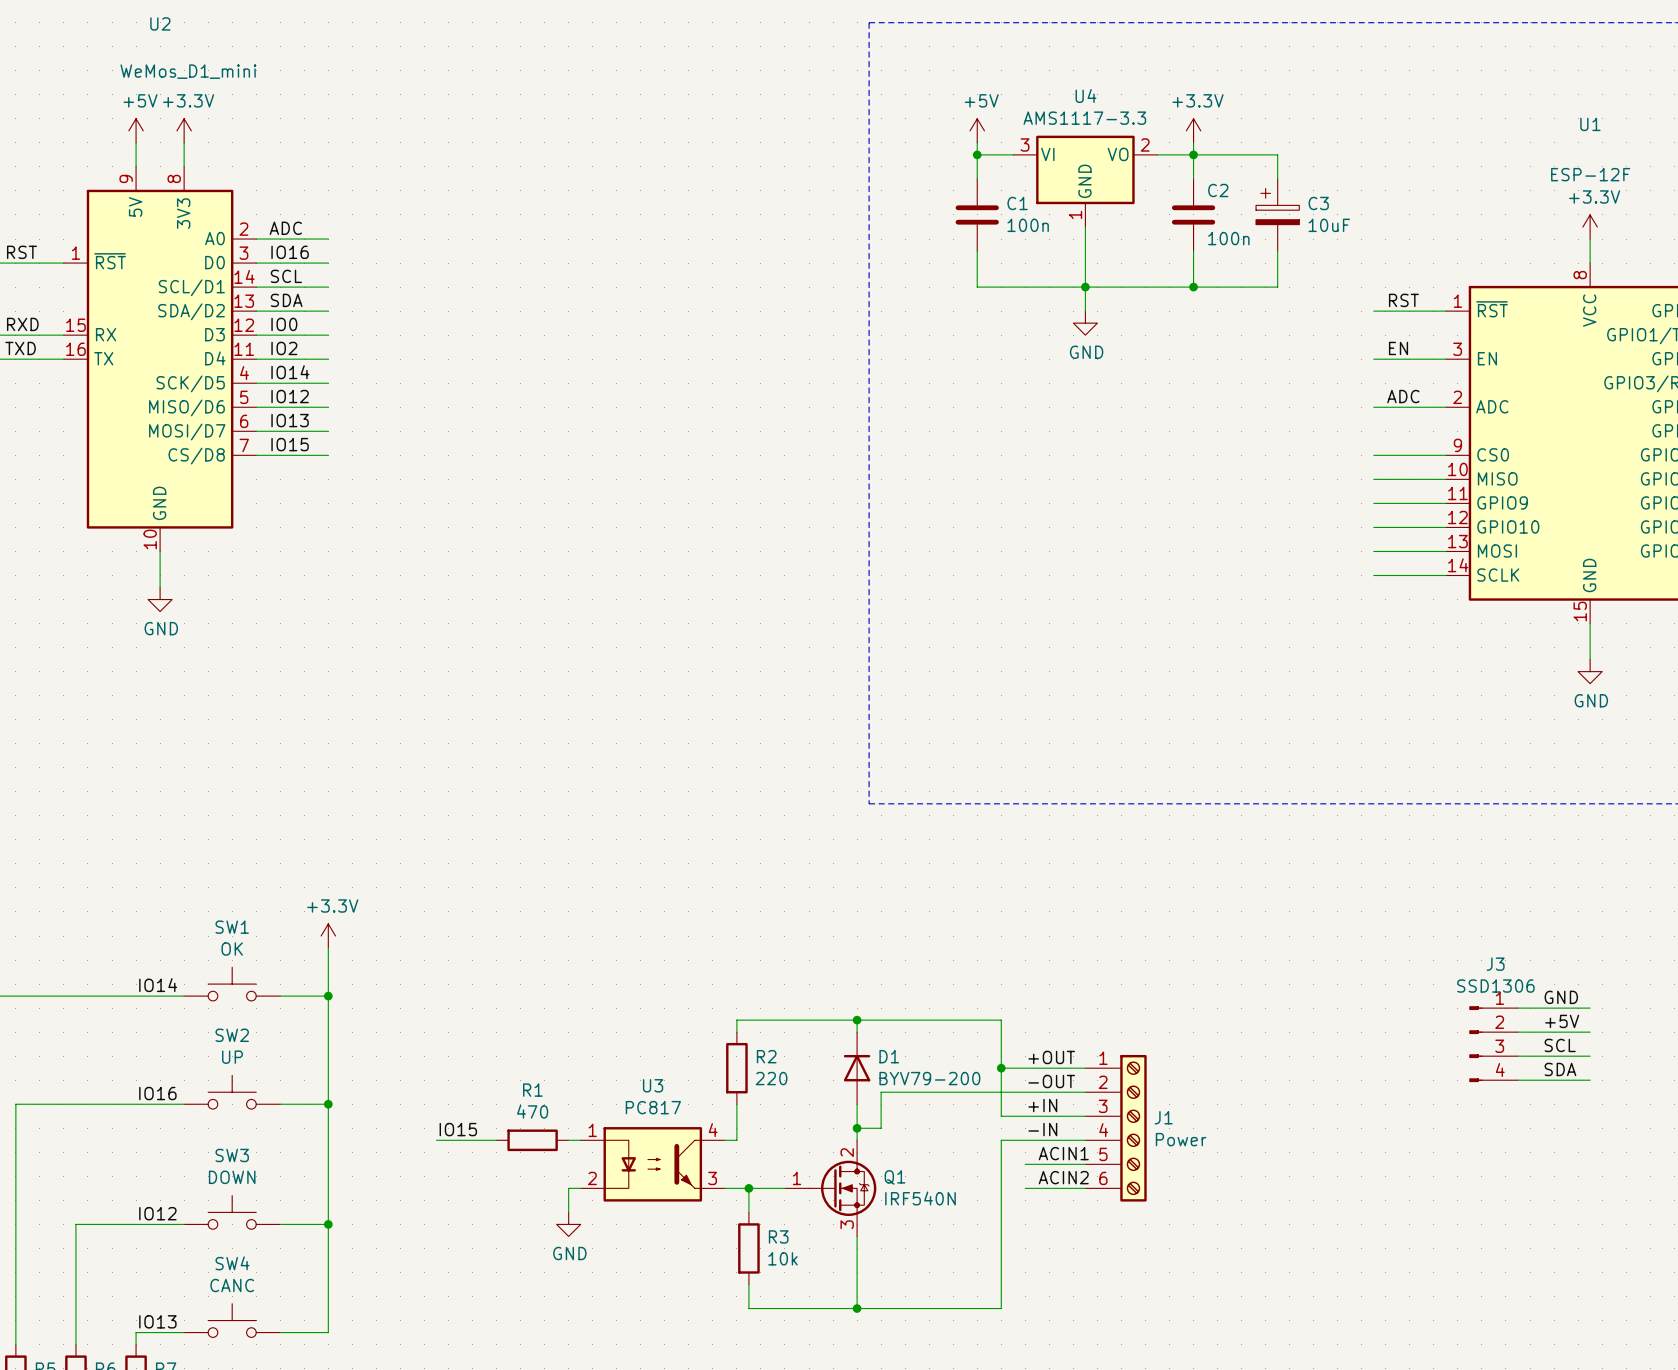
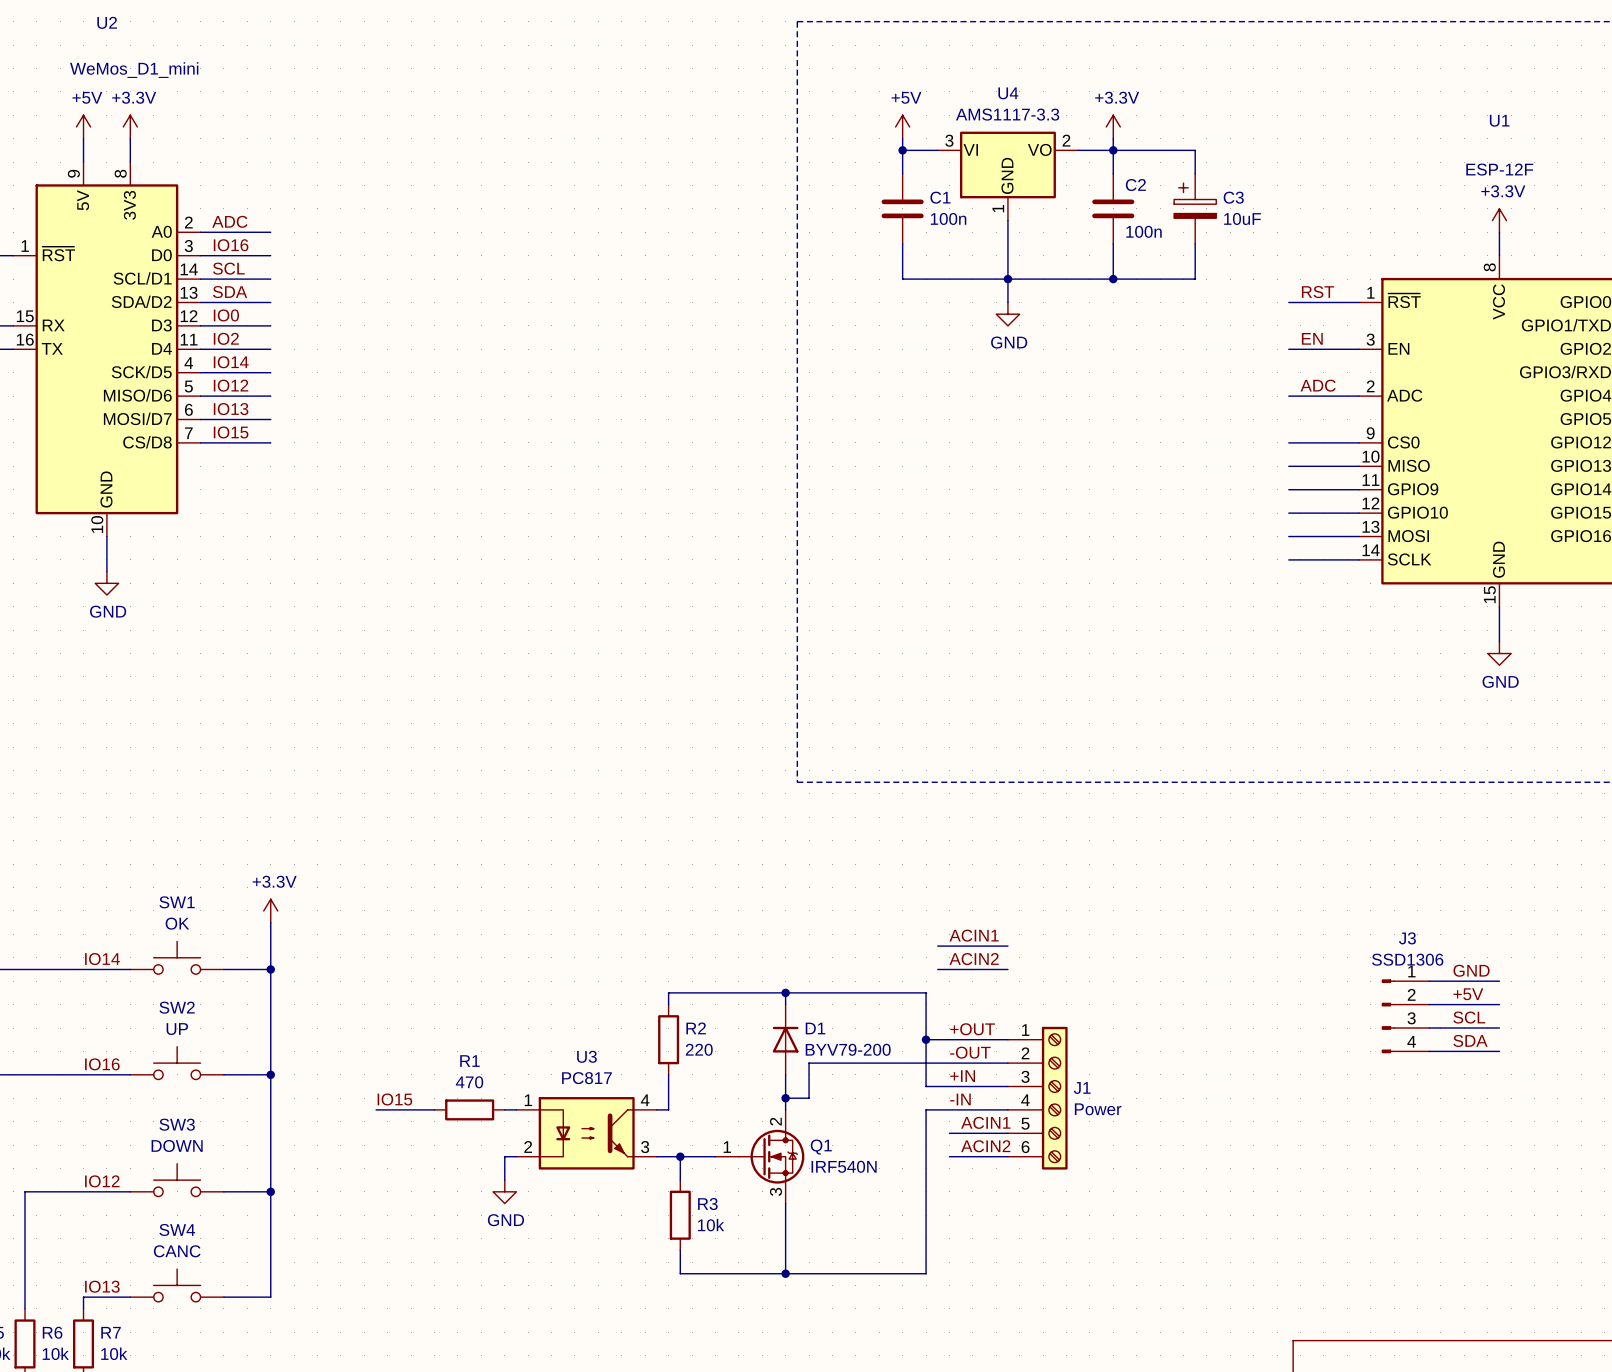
label: none -> ACIN1 (974, 935)
wire: none -> (937, 946) (1007, 946)
label: none -> ACIN2 (974, 959)
wire: none -> (937, 969) (1007, 969)

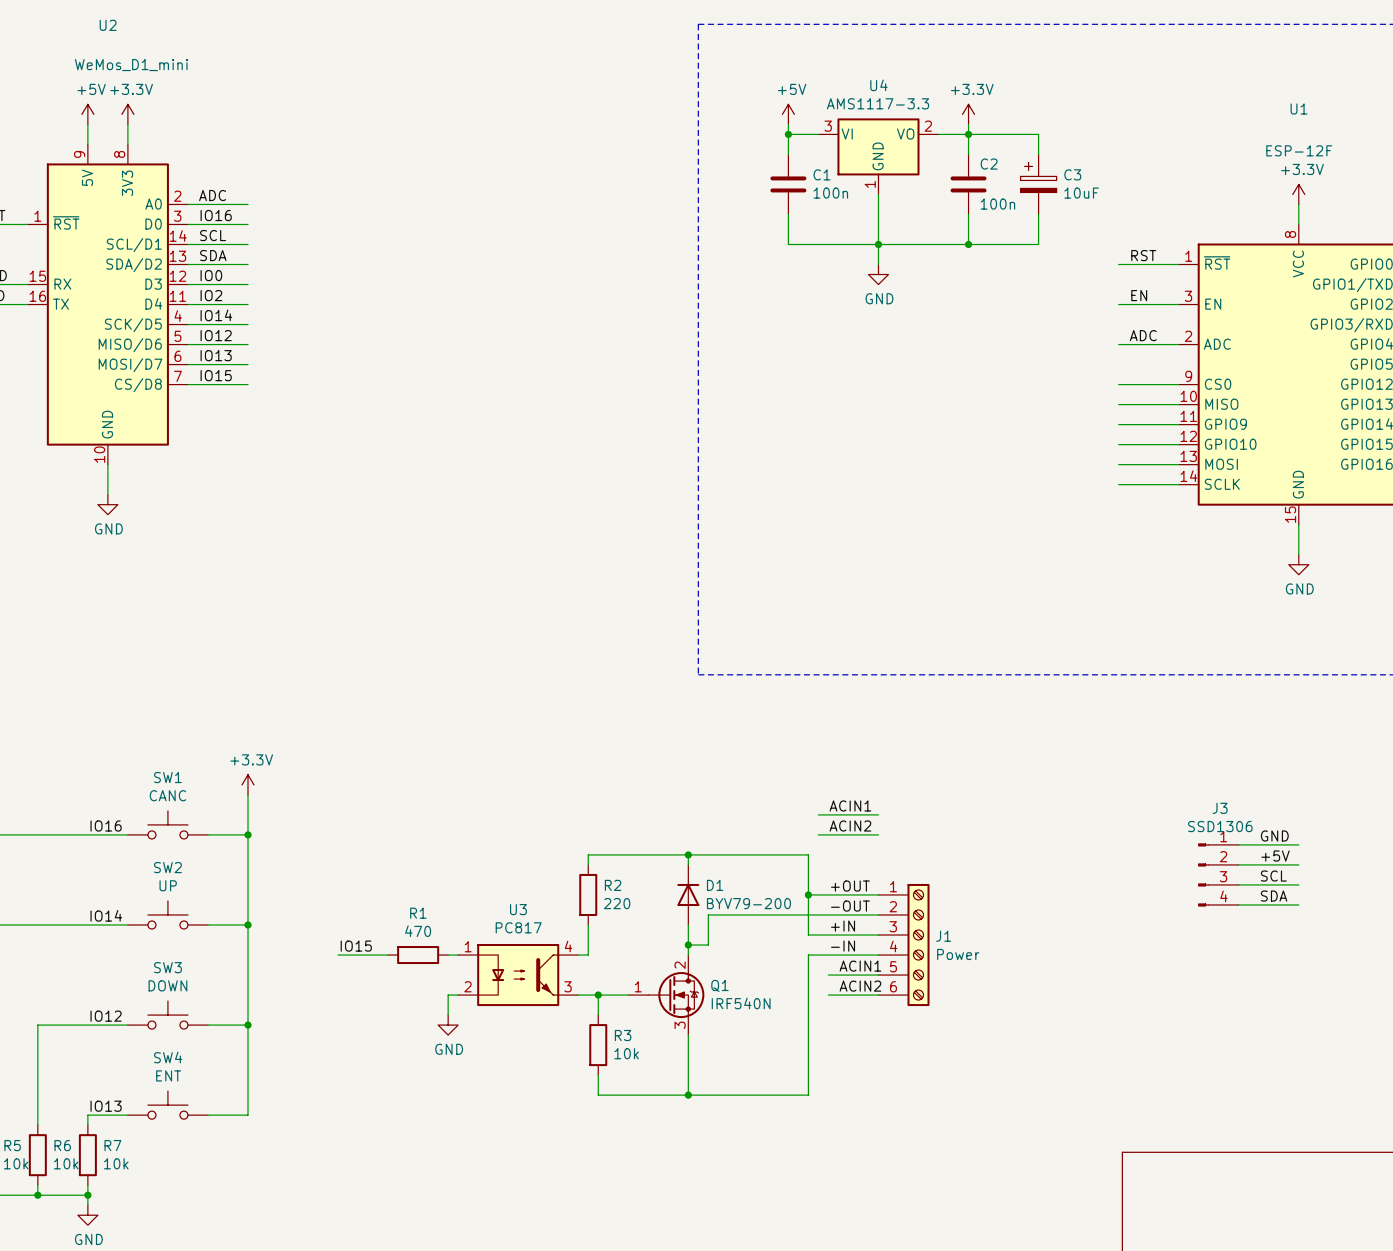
SW1 value: OK (177, 923) -> CANC (167, 795)
label: IO14 (102, 959) -> IO16 (106, 826)
label: IO16 (102, 1064) -> IO14 (106, 915)
SW4 value: CANC (177, 1251) -> ENT (168, 1075)

